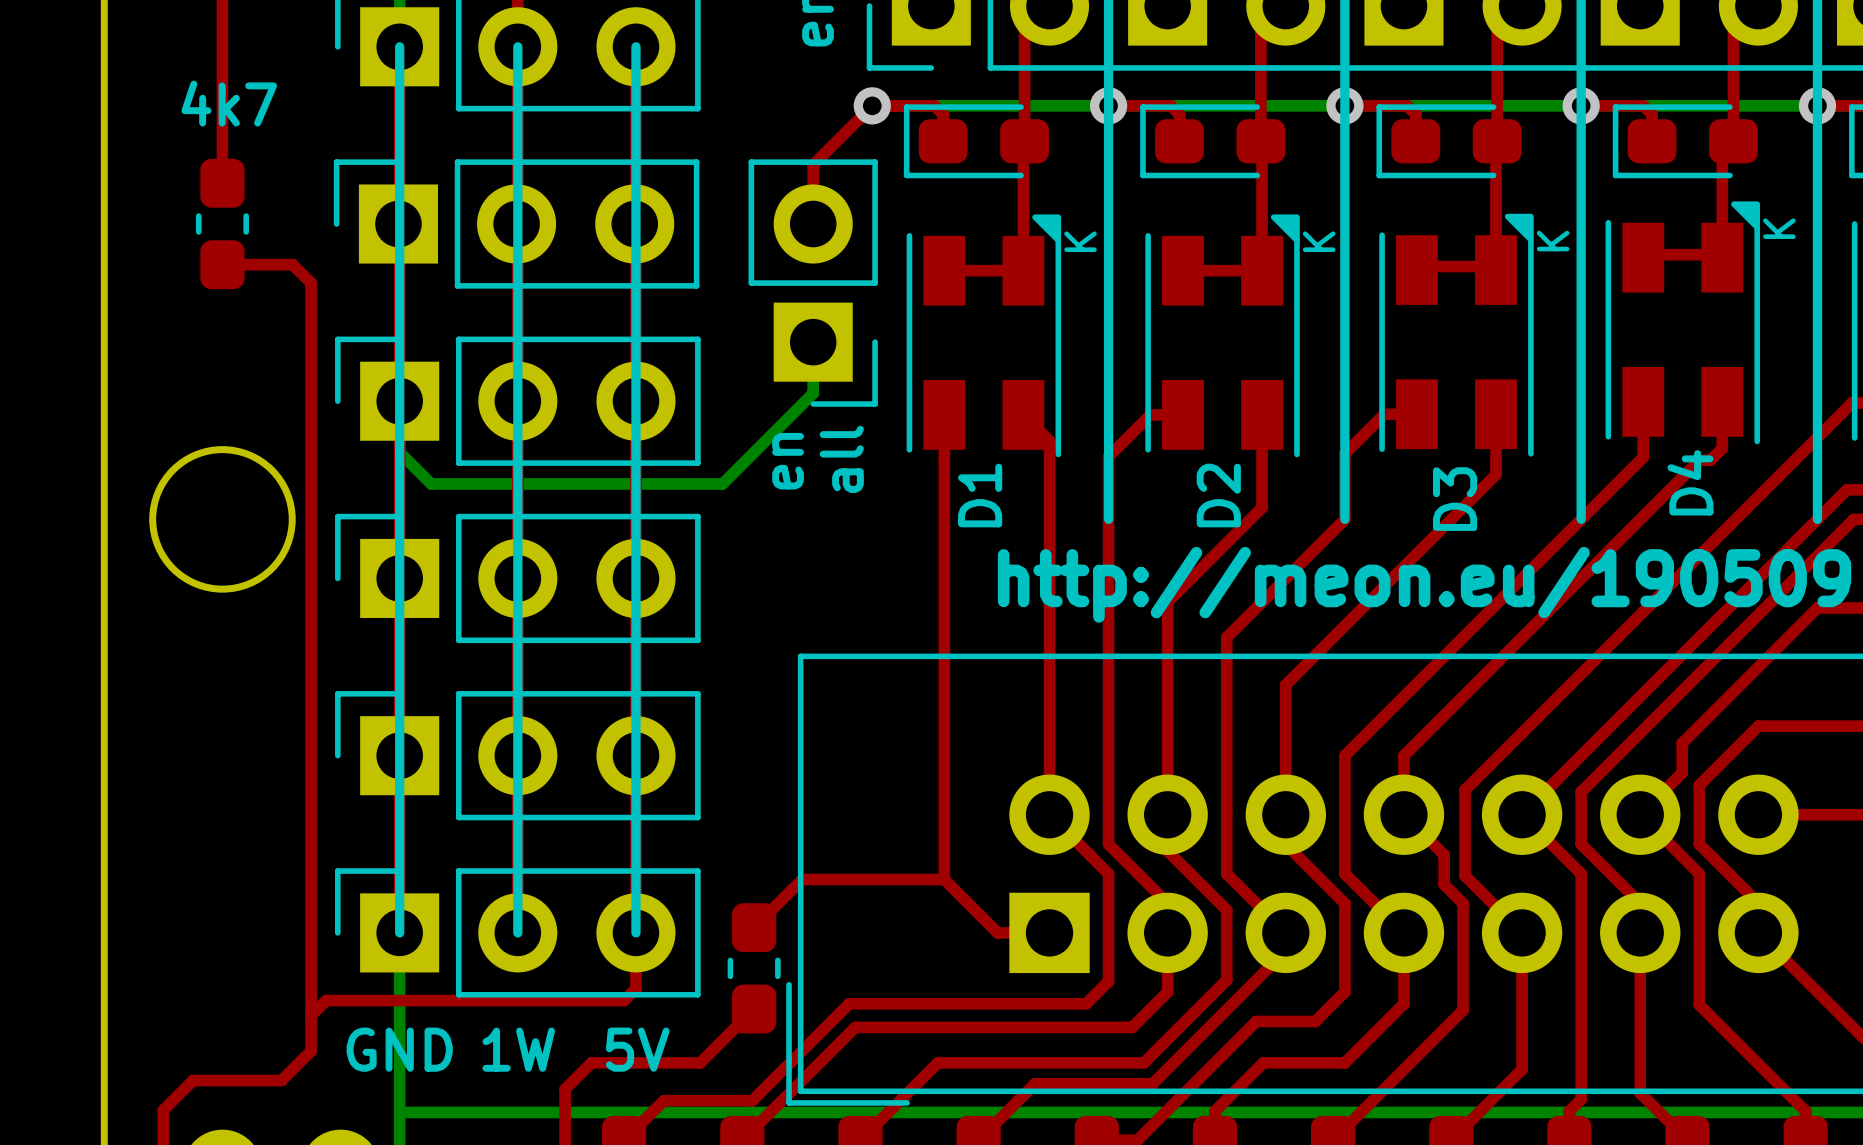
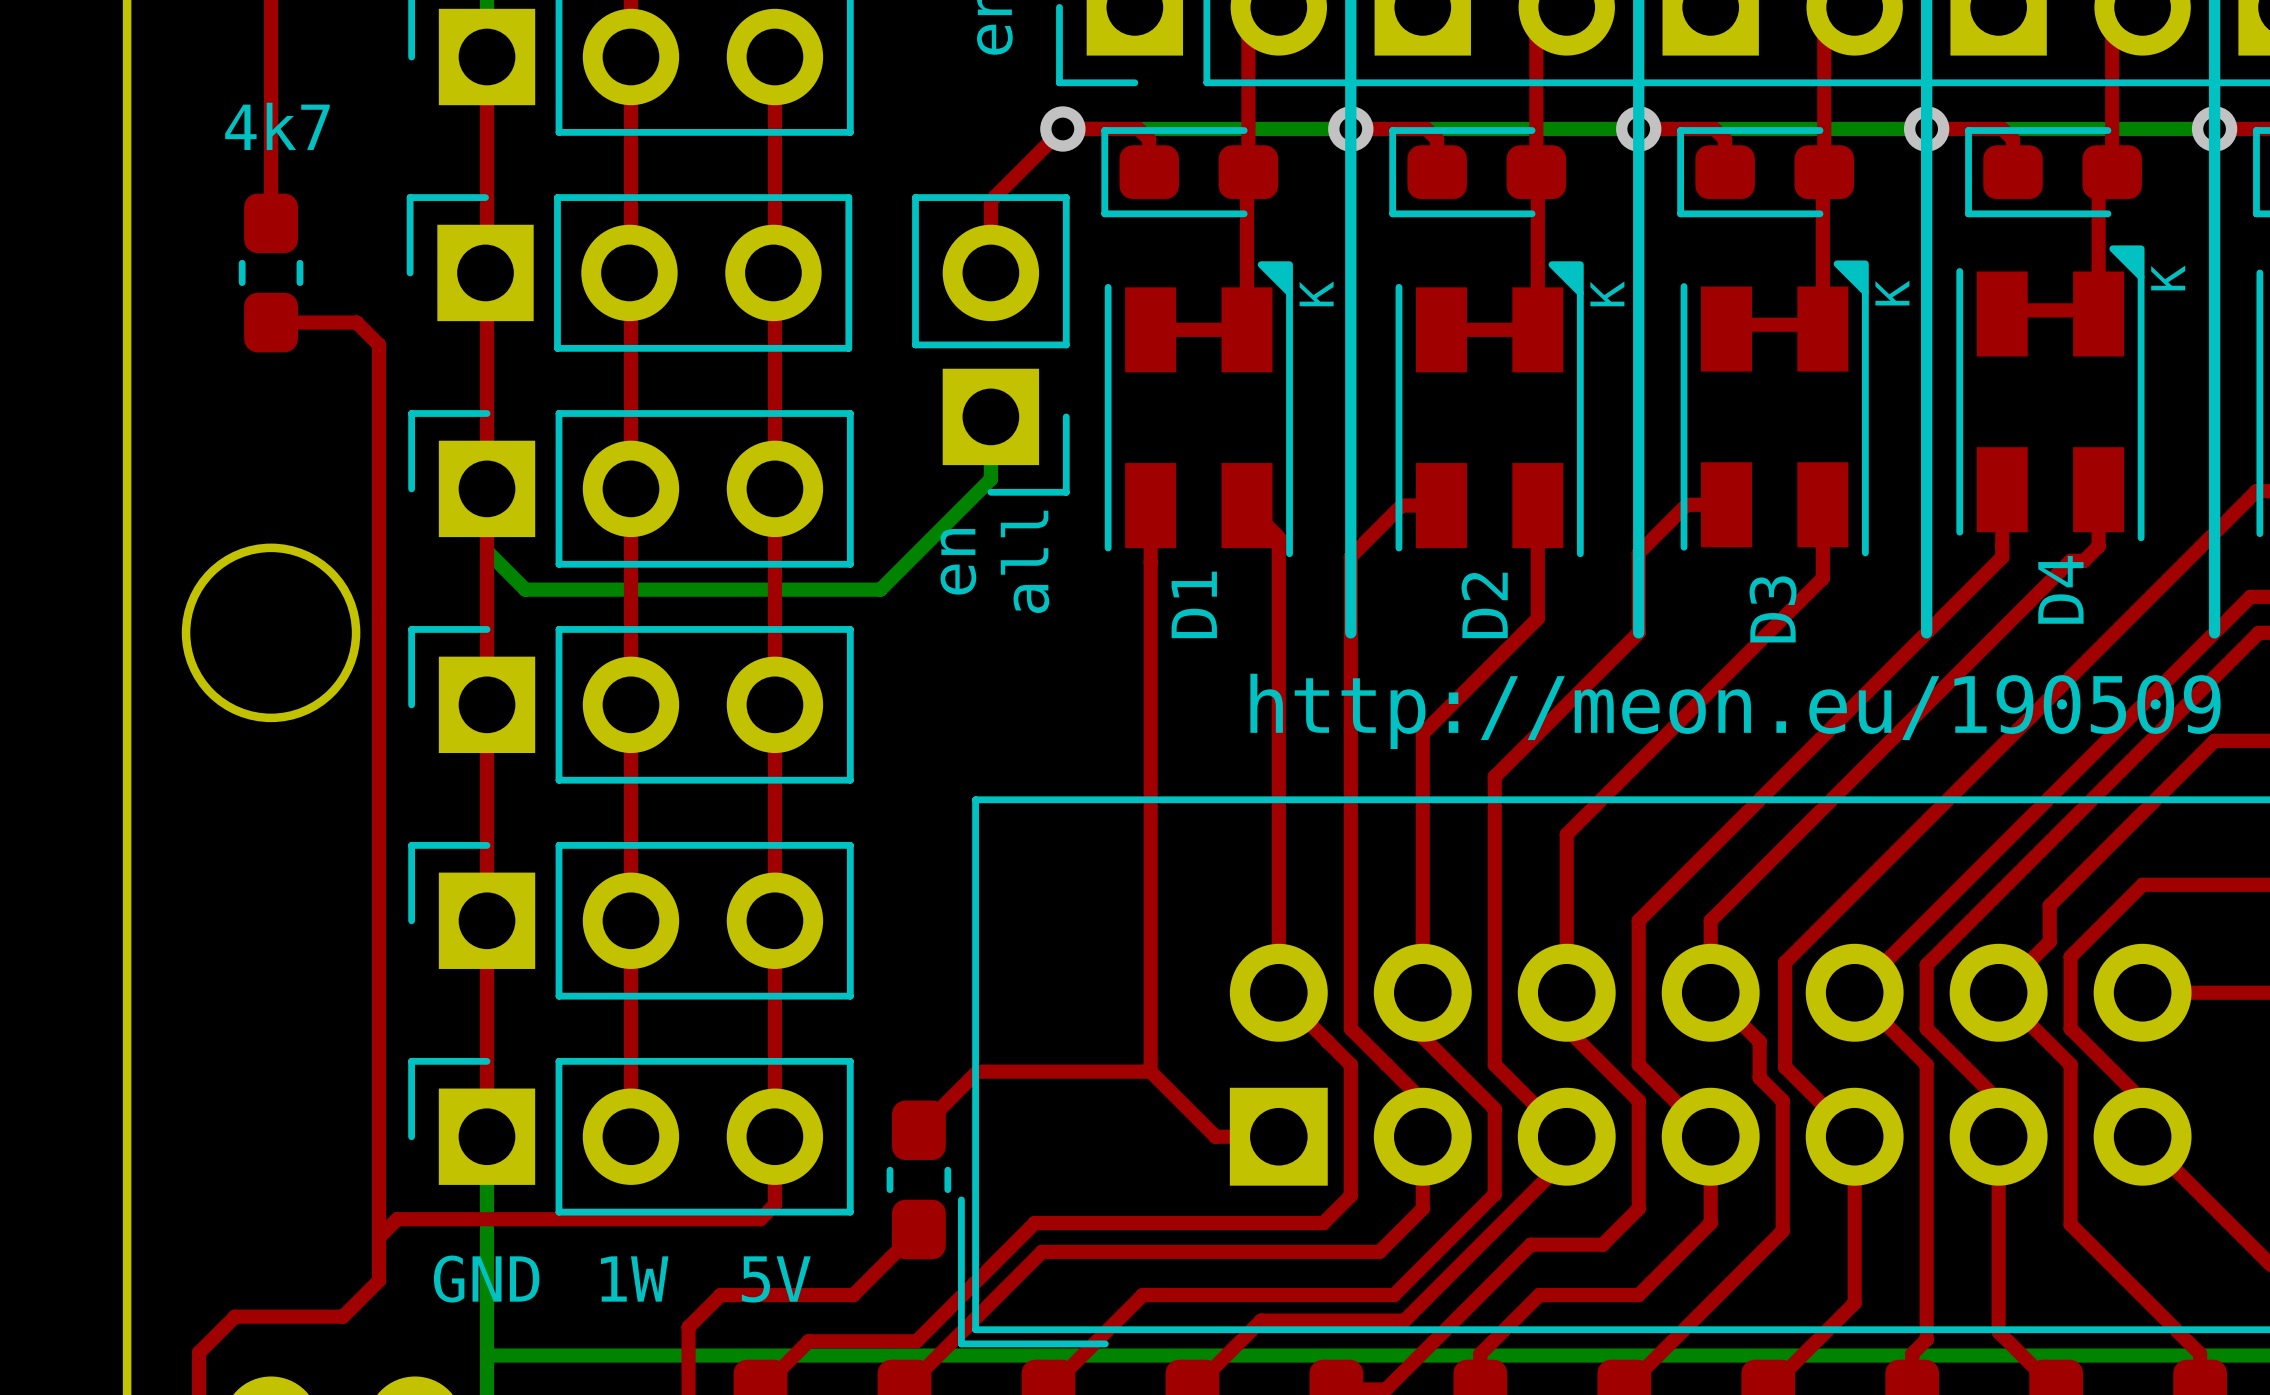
line: (399, 46) (399, 932) -> none
line: (517, 46) (517, 932) -> none
line: (635, 46) (635, 932) -> none

